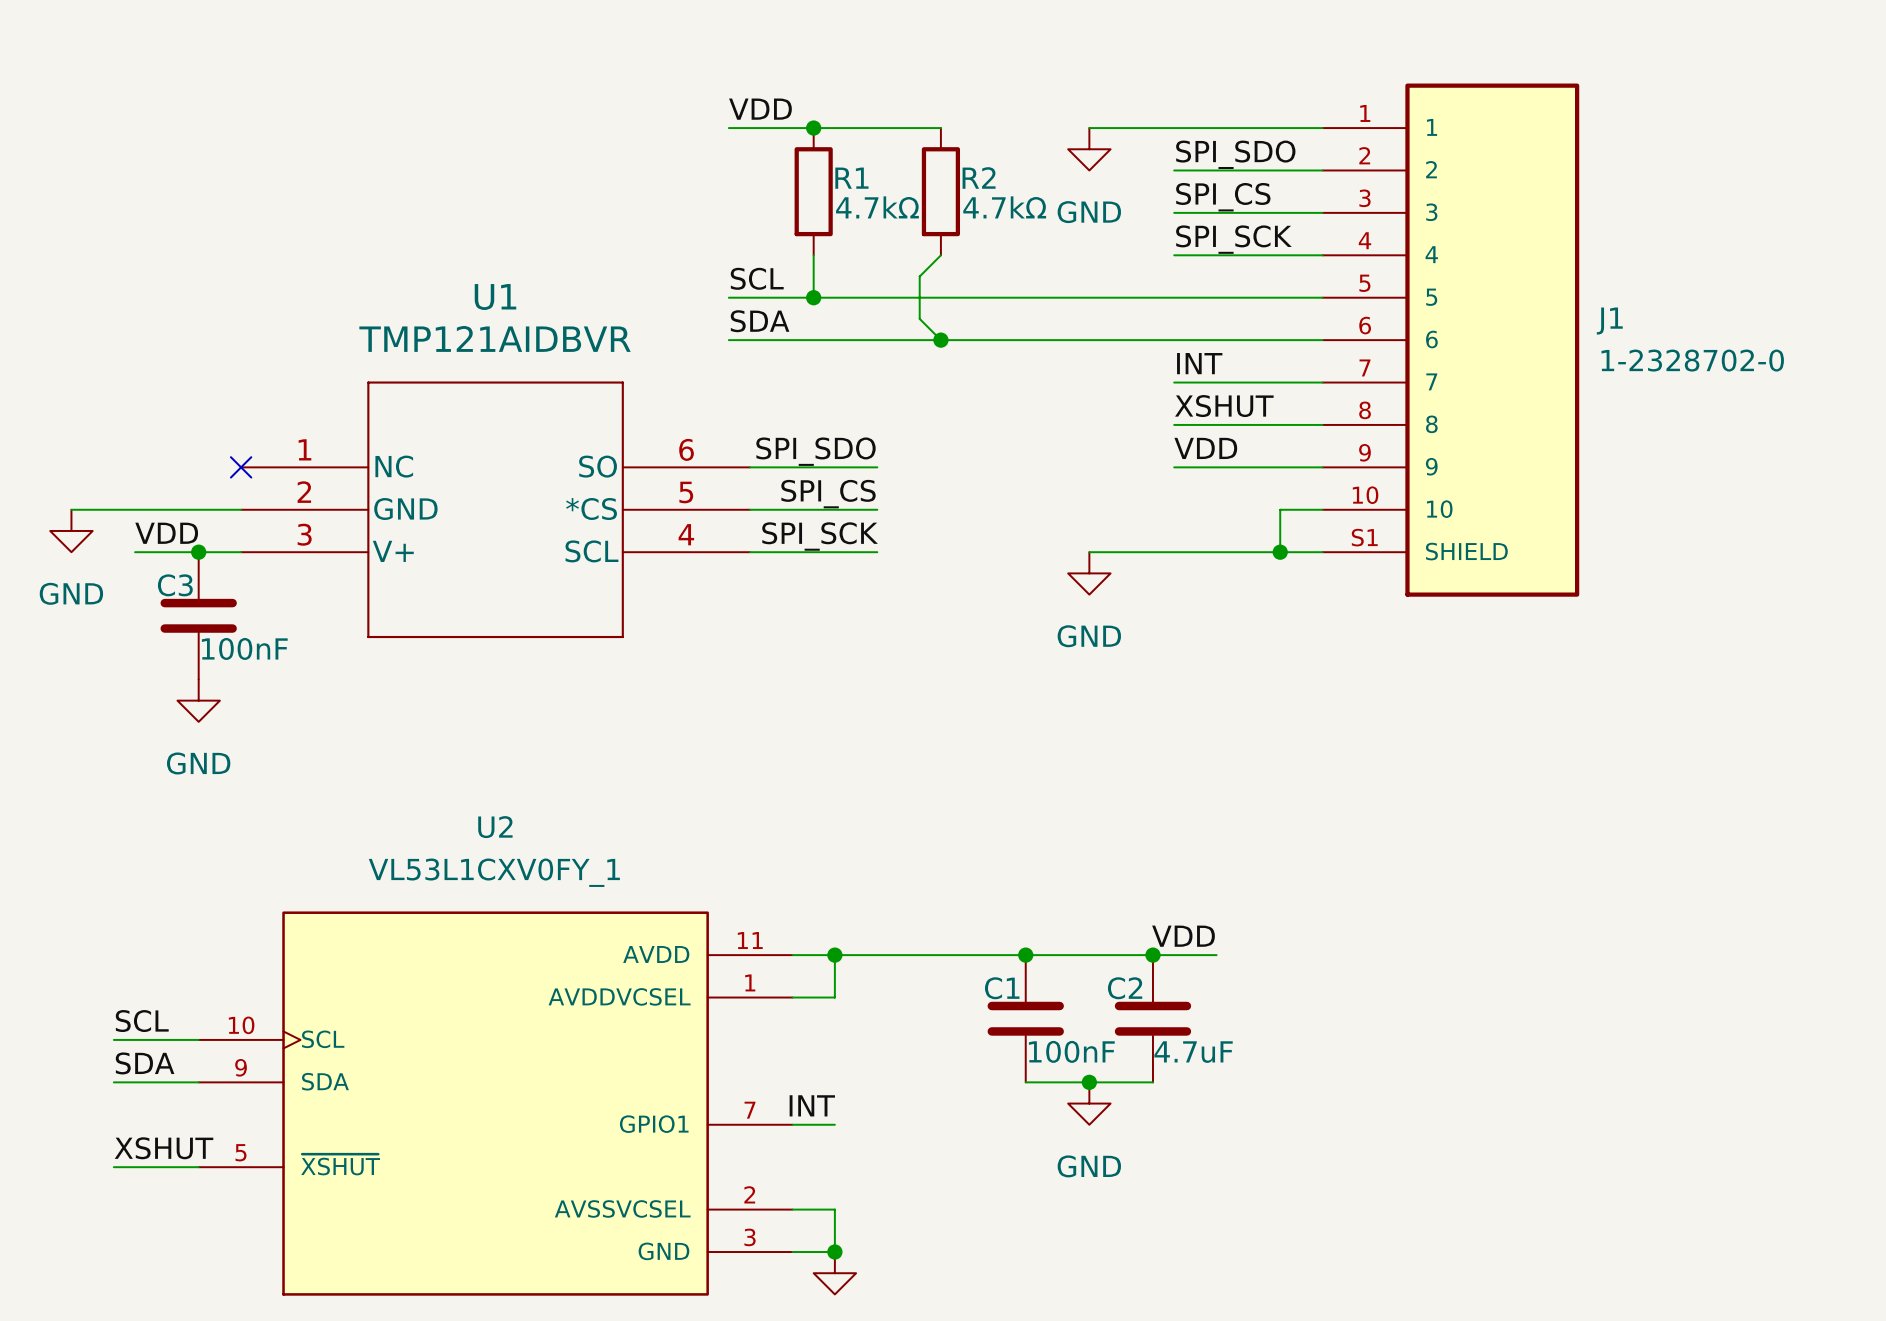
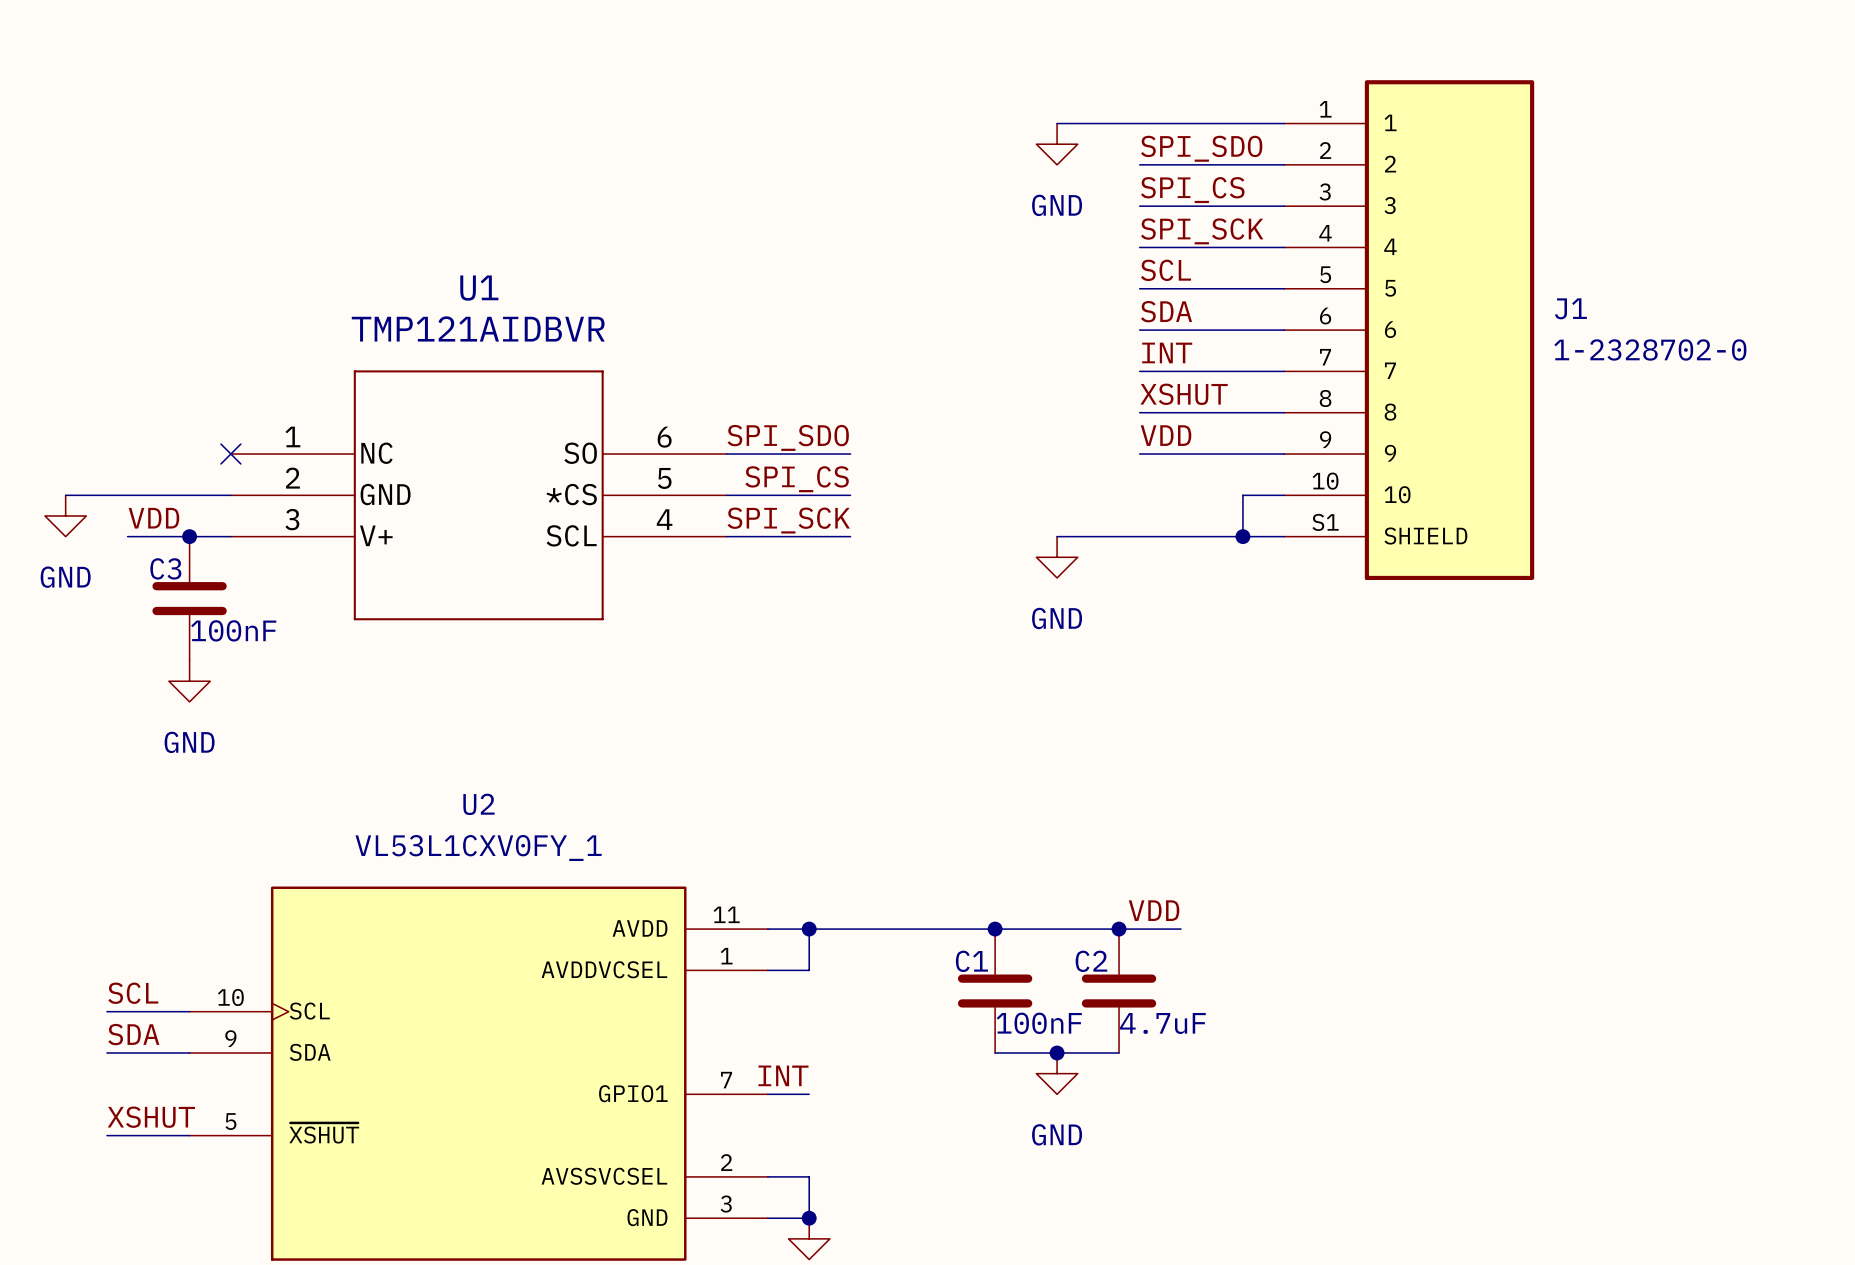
label: VDD (760, 109) -> none
wire: (728, 128) (940, 128) -> none
junction: (813, 128) -> none
R1: 4.7kΩ (813, 191) -> none
R2: 4.7kΩ (940, 191) -> none
wire: (813, 255) (813, 297) -> none
wire: (940, 255) (919, 276) (919, 318) (940, 340) -> none
label: SCL (757, 278) -> none
label: none -> SCL (1166, 270)
wire: (728, 297) (1174, 297) -> none
junction: (813, 297) -> none
label: SDA (760, 321) -> none
label: none -> SDA (1166, 311)
wire: (728, 340) (1174, 340) -> none
junction: (940, 340) -> none

